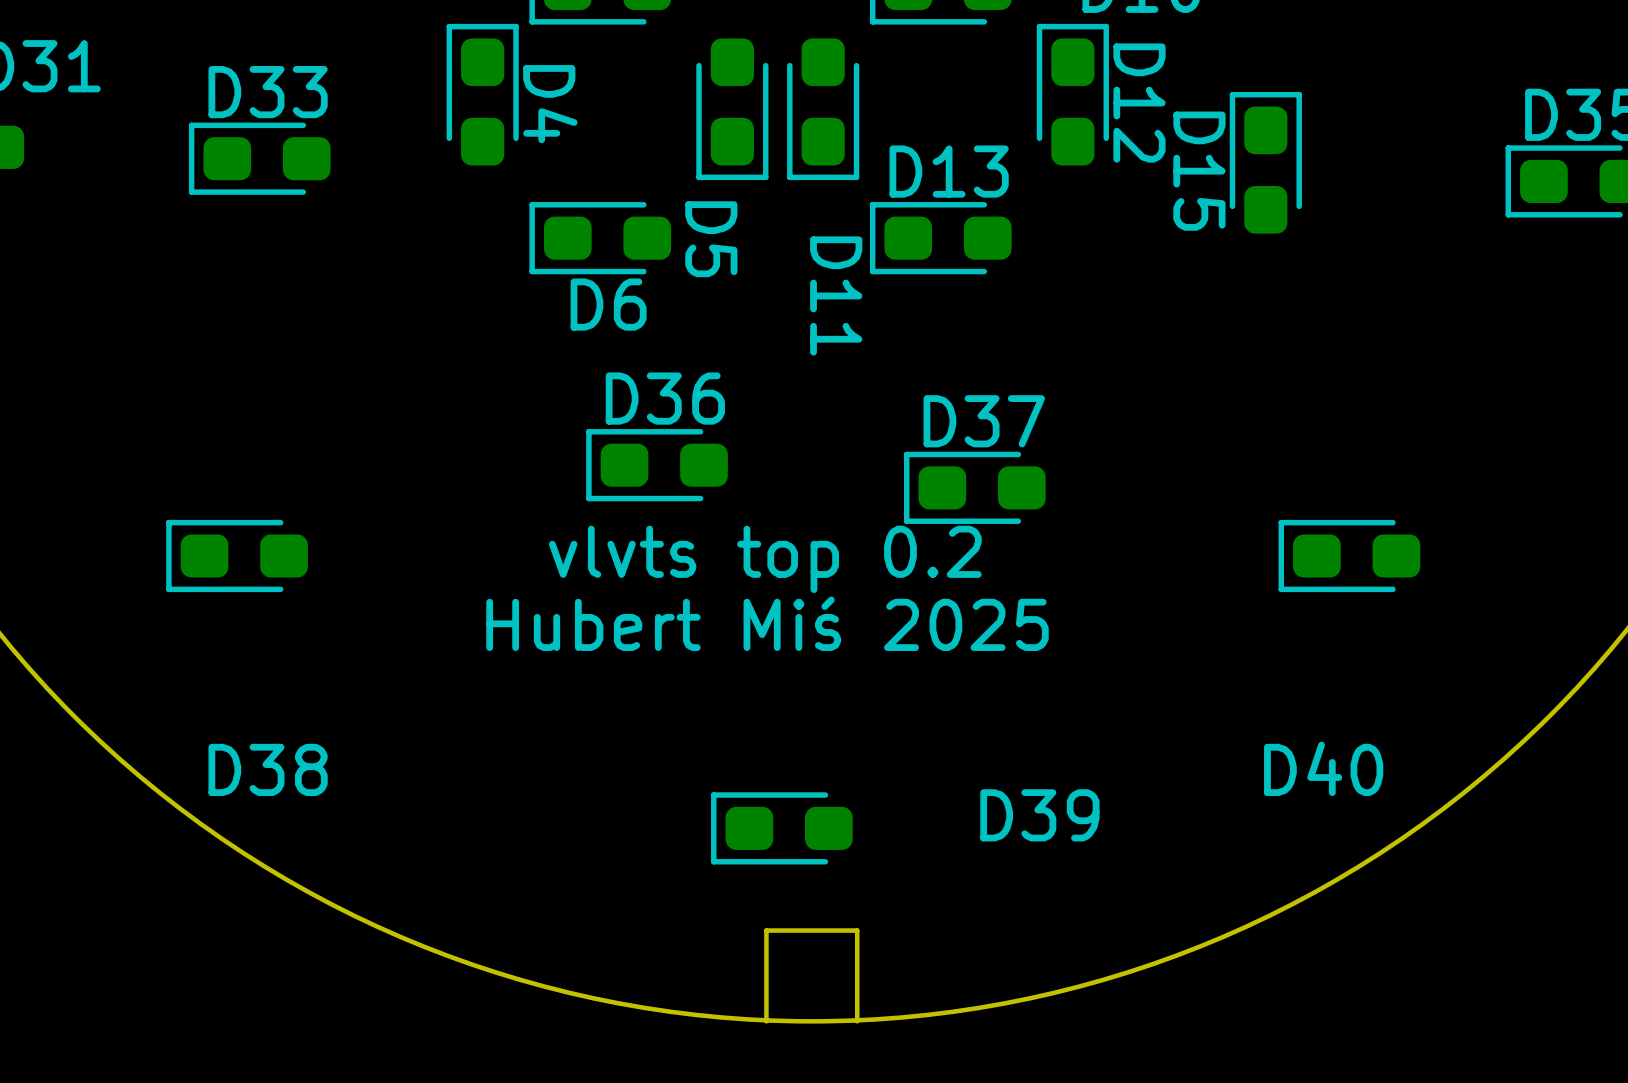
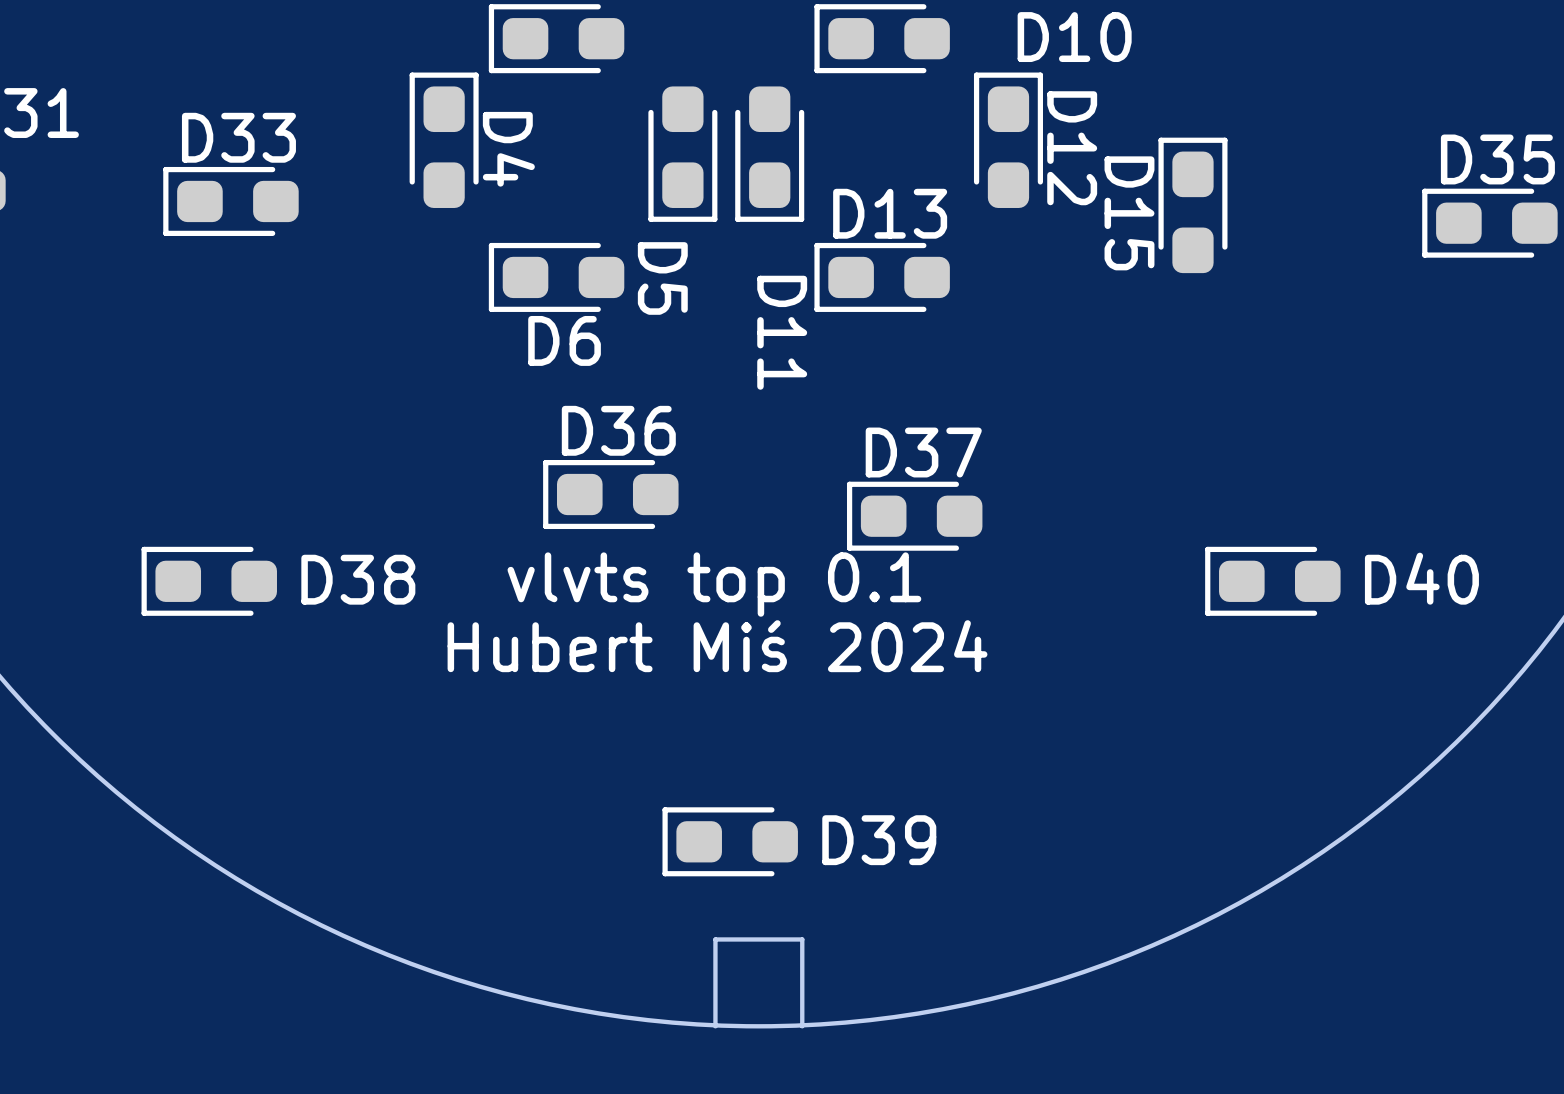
text: vlvts top 0.2 (765, 559) -> vlvts top 0.1 (714, 584)
text: Hubert Miś 2025 (767, 623) -> Hubert Miś 2024 (717, 646)
D40 name position: D40 (1323, 768) -> D40 (1421, 578)
D38 name position: D38 (268, 769) -> D38 (358, 579)
D39 name position: D39 (1039, 815) -> D39 (879, 840)

